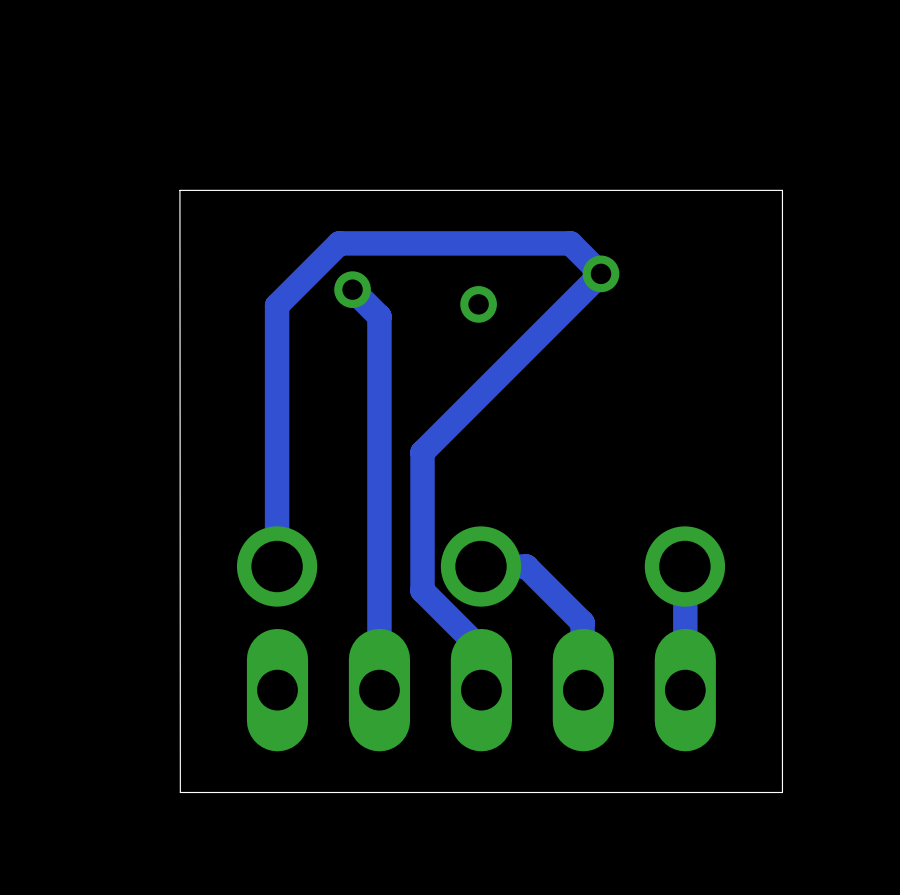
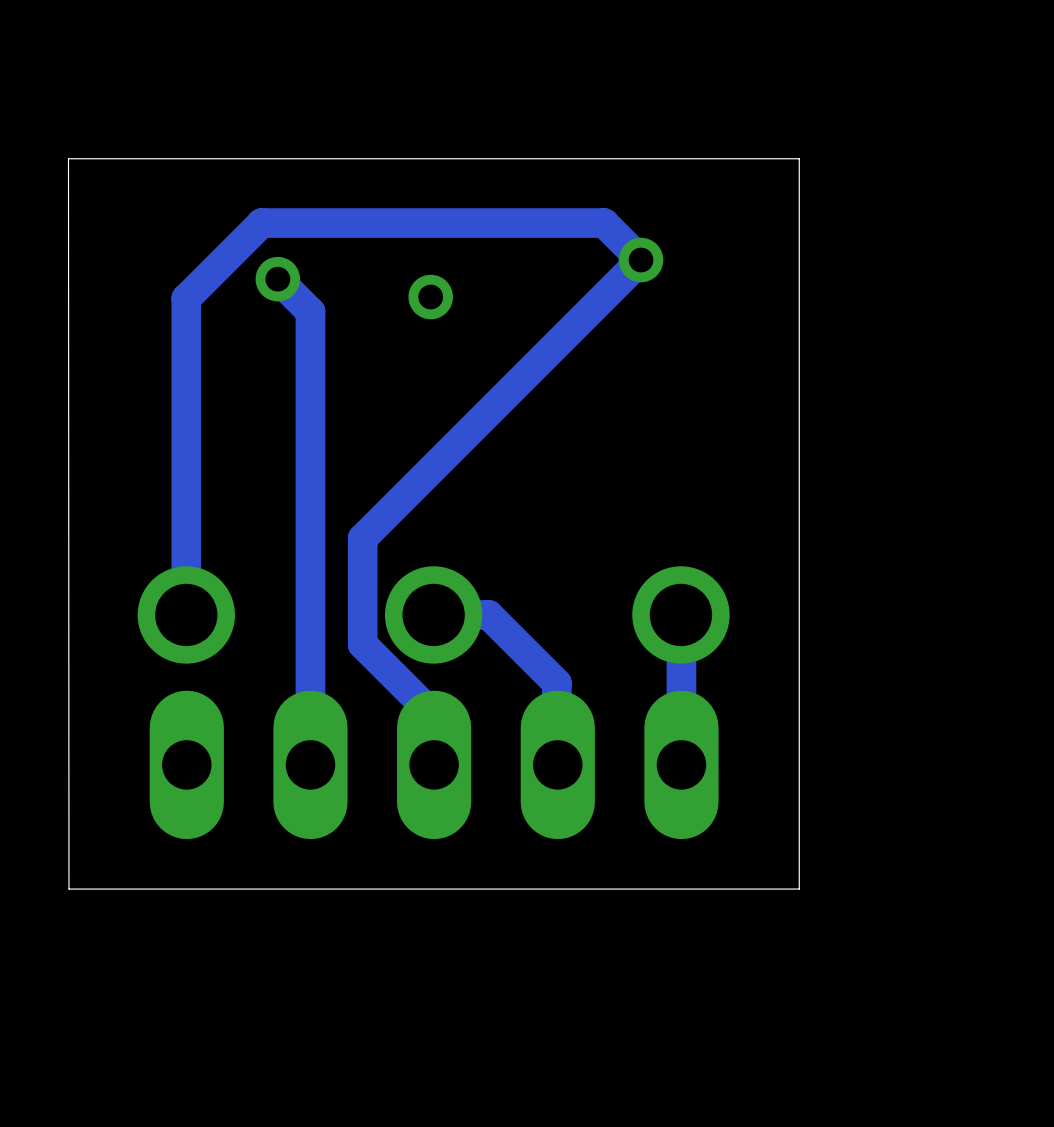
track: (570, 243) (601, 273) (422, 452) (422, 503) -> (542, 223) (604, 223) (641, 260) (362, 538)
via position: (601, 273) -> (641, 260)

